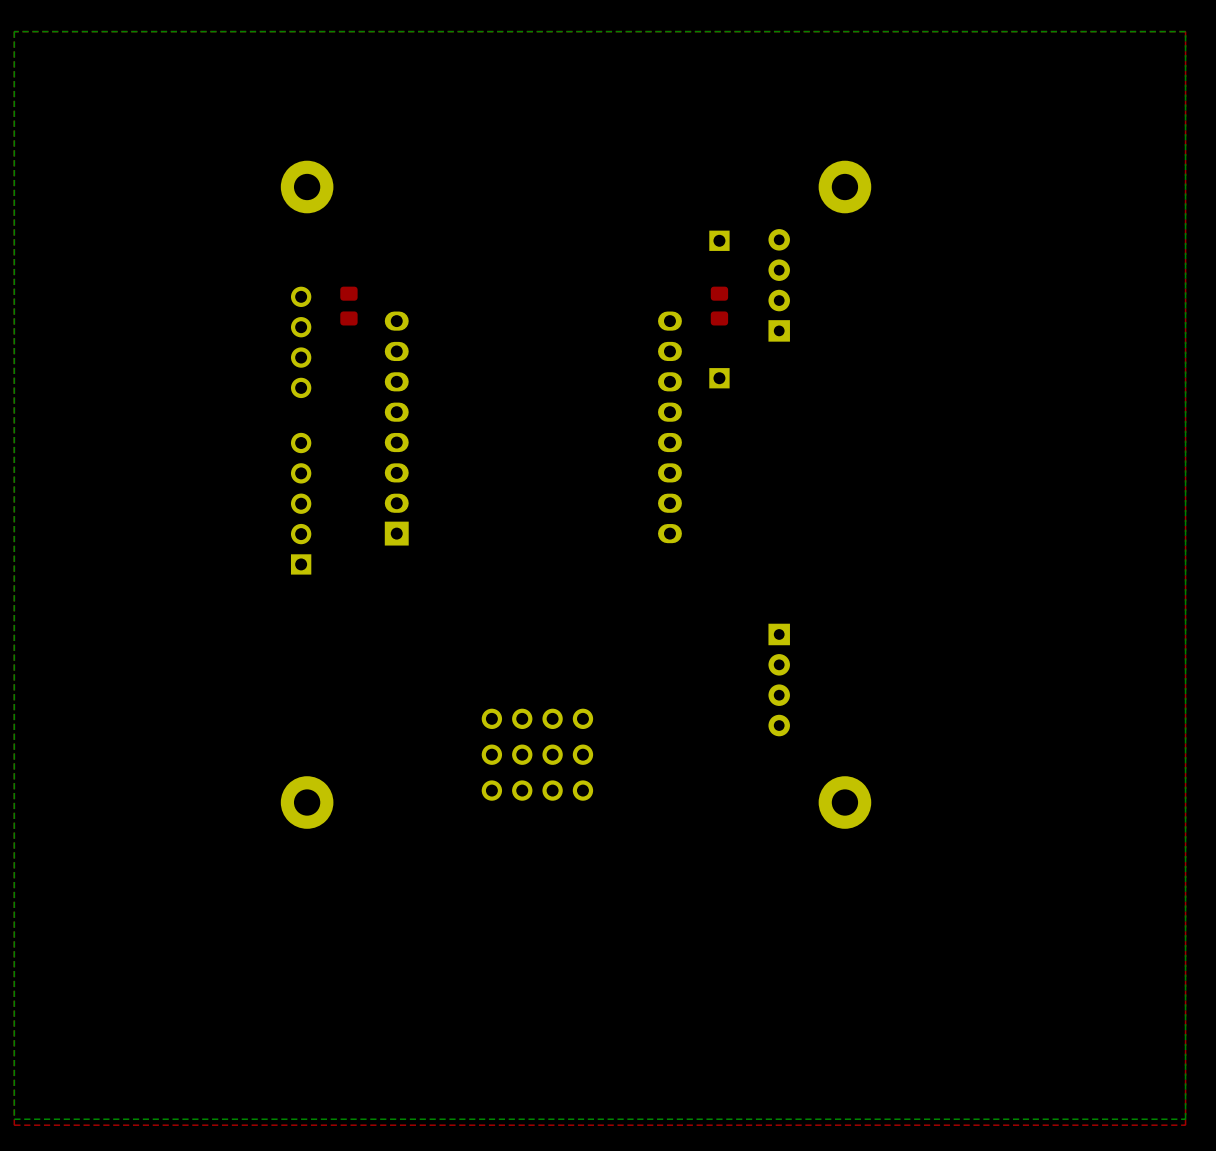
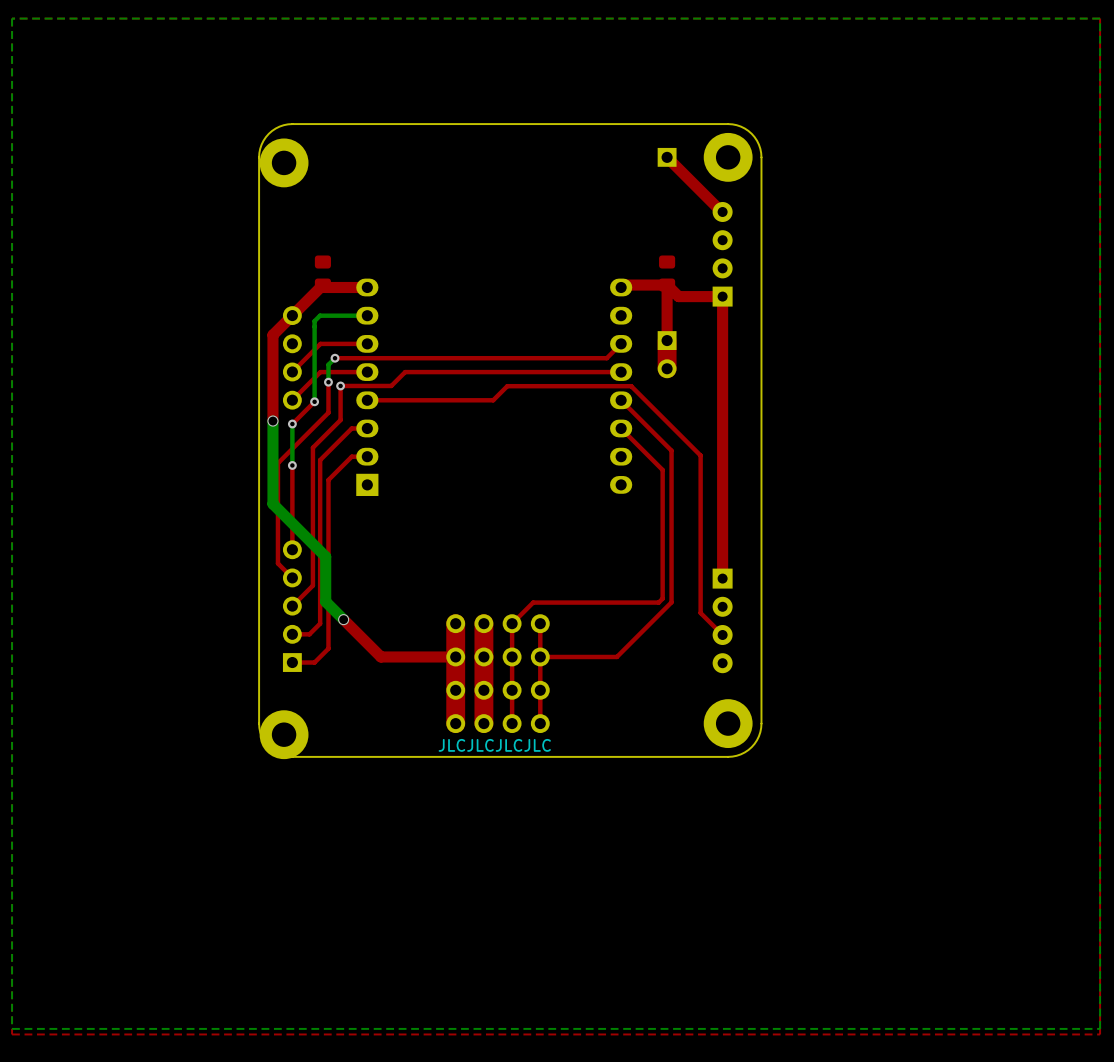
board edge: none -> (728, 124) (292, 124) (275, 128) (265, 137) (261, 144) (259, 157) (259, 723) (261, 736) (272, 750) (279, 754) (292, 756) (728, 756) (740, 754) (754, 743) (760, 732) (761, 723) (761, 157) (758, 144) (751, 133) (740, 126) (728, 124)
top track: none -> (667, 157) (721, 211)
part position: (844, 187) -> (728, 157)
part position: (719, 240) -> (667, 157)
top track: none -> (667, 285) (678, 296) (722, 296) (722, 578)
top track: none -> (667, 285) (623, 285) (621, 287)
top track: none -> (667, 285) (667, 368) (667, 340)
top track: none -> (367, 287) (325, 287) (322, 285) (272, 335) (272, 421)
part position: (301, 342) -> (292, 357)
bottom track: none -> (367, 315) (320, 315) (314, 321) (314, 401)
part: (719, 378) -> none
top track: none -> (367, 343) (320, 343) (292, 371)
top track: none -> (621, 343) (606, 358) (335, 358)
part: none -> (667, 354)
bottom track: none -> (335, 358) (328, 364) (328, 382)
via: none -> (335, 358)
top track: none -> (367, 372) (320, 372) (292, 400)
top track: none -> (621, 372) (405, 372) (391, 385) (340, 385) (340, 420) (312, 447) (312, 585) (292, 606)
top track: none -> (328, 382) (328, 412) (277, 463) (277, 563) (292, 577)
via: none -> (328, 382)
via: none -> (340, 385)
top track: none -> (367, 400) (493, 400) (507, 386) (631, 386) (700, 455) (700, 613) (722, 634)
top track: none -> (621, 400) (671, 450) (671, 602) (616, 656) (540, 656)
top track: none -> (314, 401) (292, 424)
via: none -> (314, 401)
bottom track: none -> (272, 421) (272, 504) (325, 556) (325, 601) (343, 619)
via: none -> (272, 421)
bottom track: none -> (292, 424) (292, 465)
via: none -> (292, 424)
top track: none -> (367, 428) (351, 428) (320, 460) (320, 623) (309, 634) (292, 634)
top track: none -> (621, 428) (662, 470) (662, 598) (658, 602) (533, 602) (512, 623) (512, 723)
part position: (301, 503) -> (292, 606)
top track: none -> (367, 456) (351, 456) (328, 480) (328, 648) (314, 662) (292, 662)
top track: none -> (292, 465) (292, 549)
via: none -> (292, 465)
top track: none -> (343, 619) (380, 656) (455, 656)
via: none -> (343, 619)
top track: none -> (455, 623) (455, 723)
top track: none -> (483, 623) (483, 723)
part: none -> (498, 623)
top track: none -> (540, 623) (540, 723)
part position: (844, 802) -> (728, 723)
text: none -> JLCJLCJLCJLC (494, 745)

